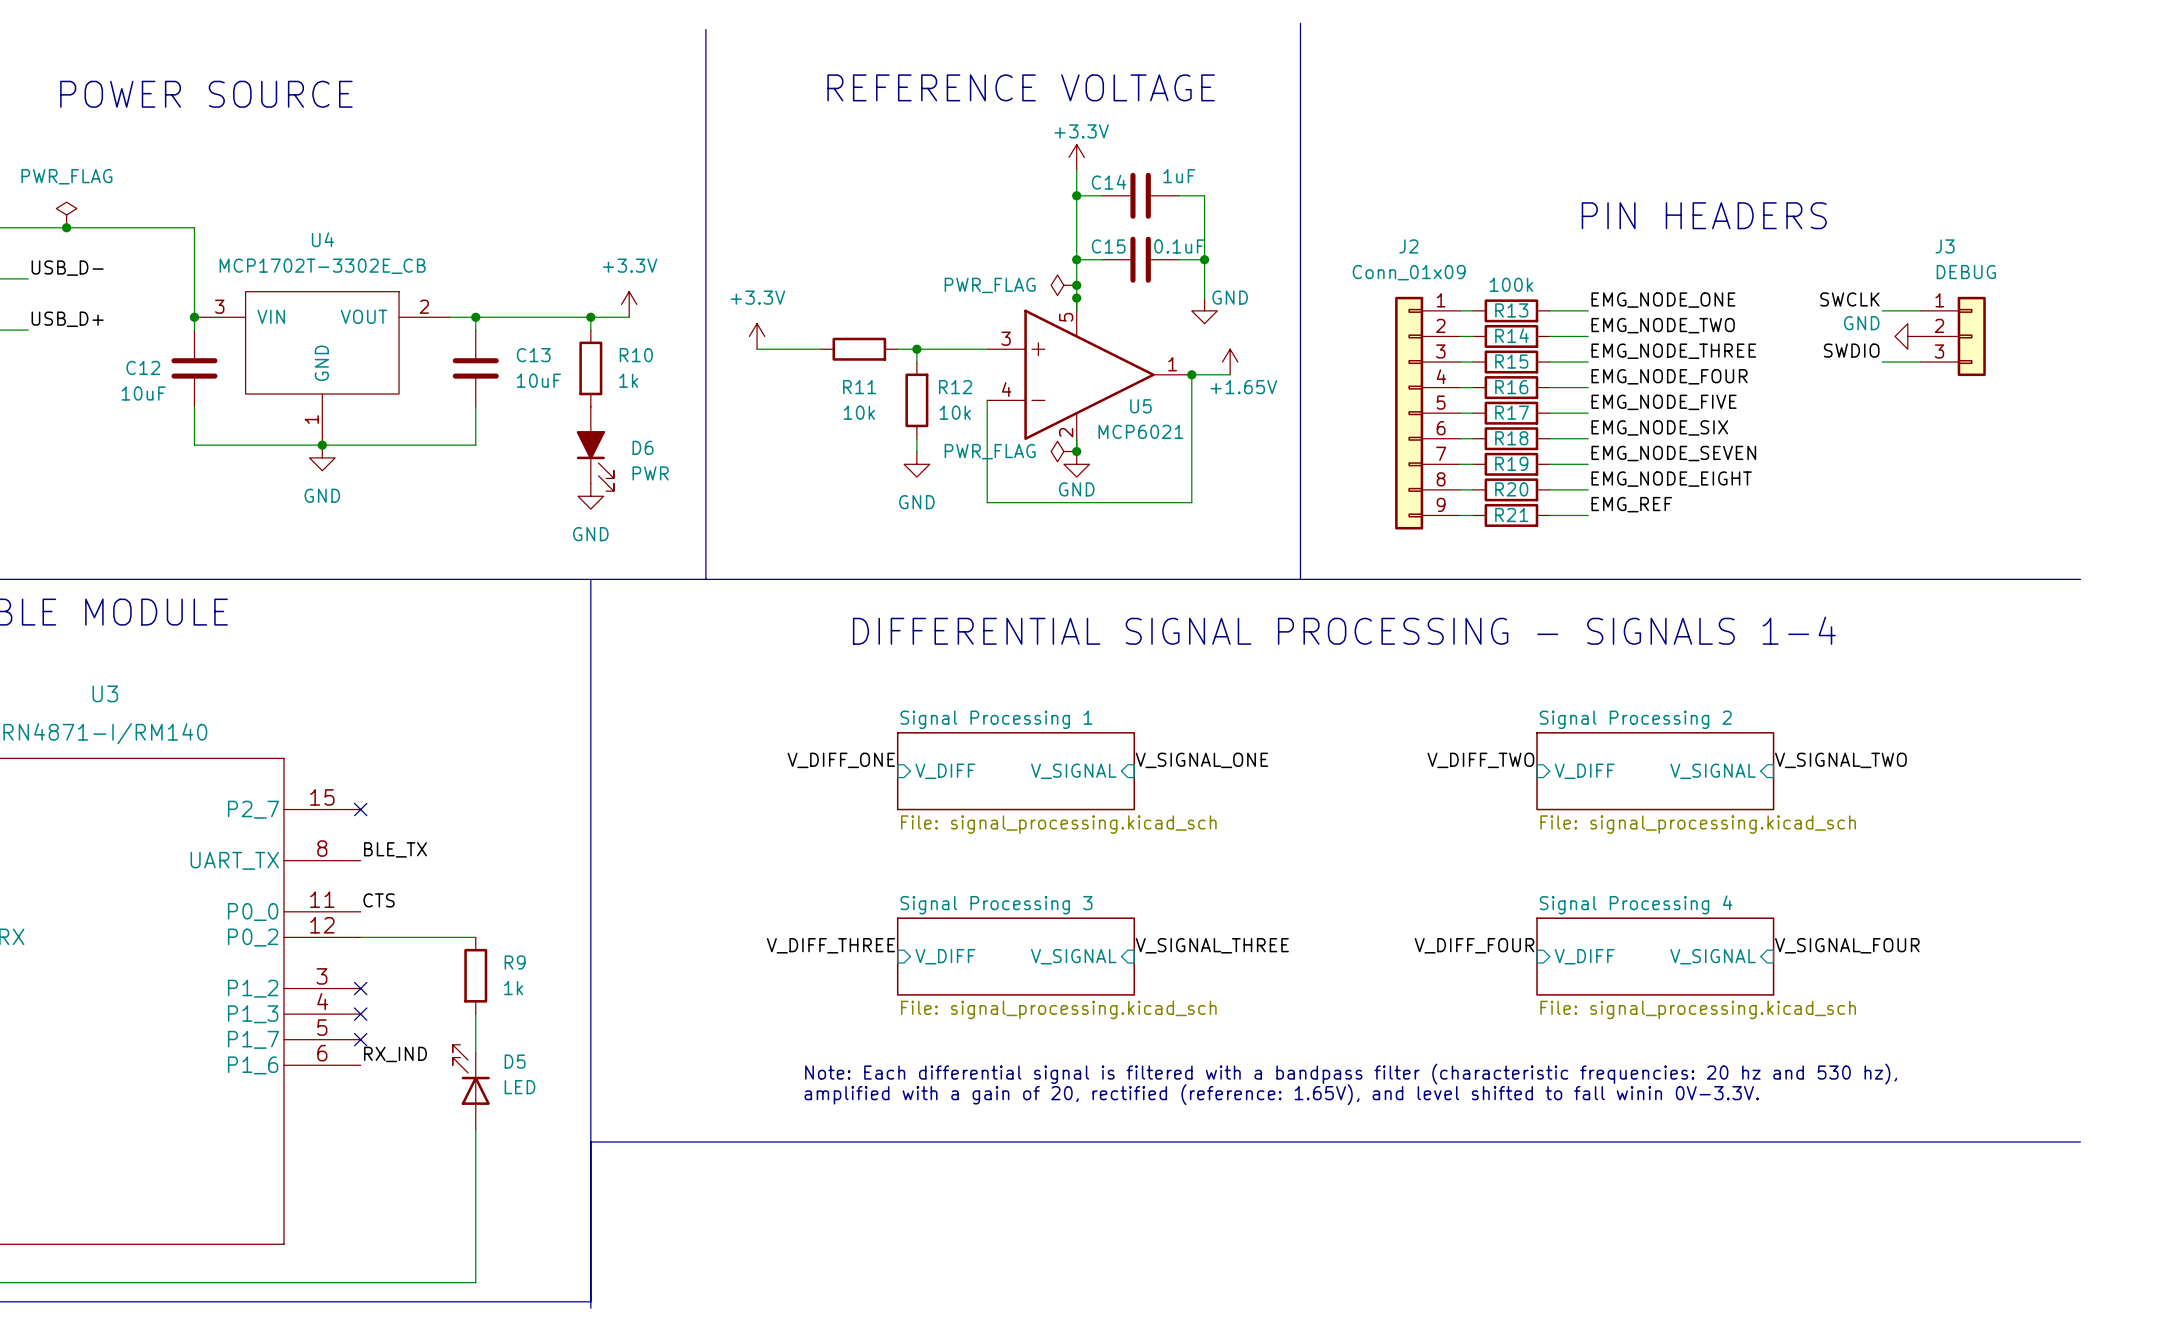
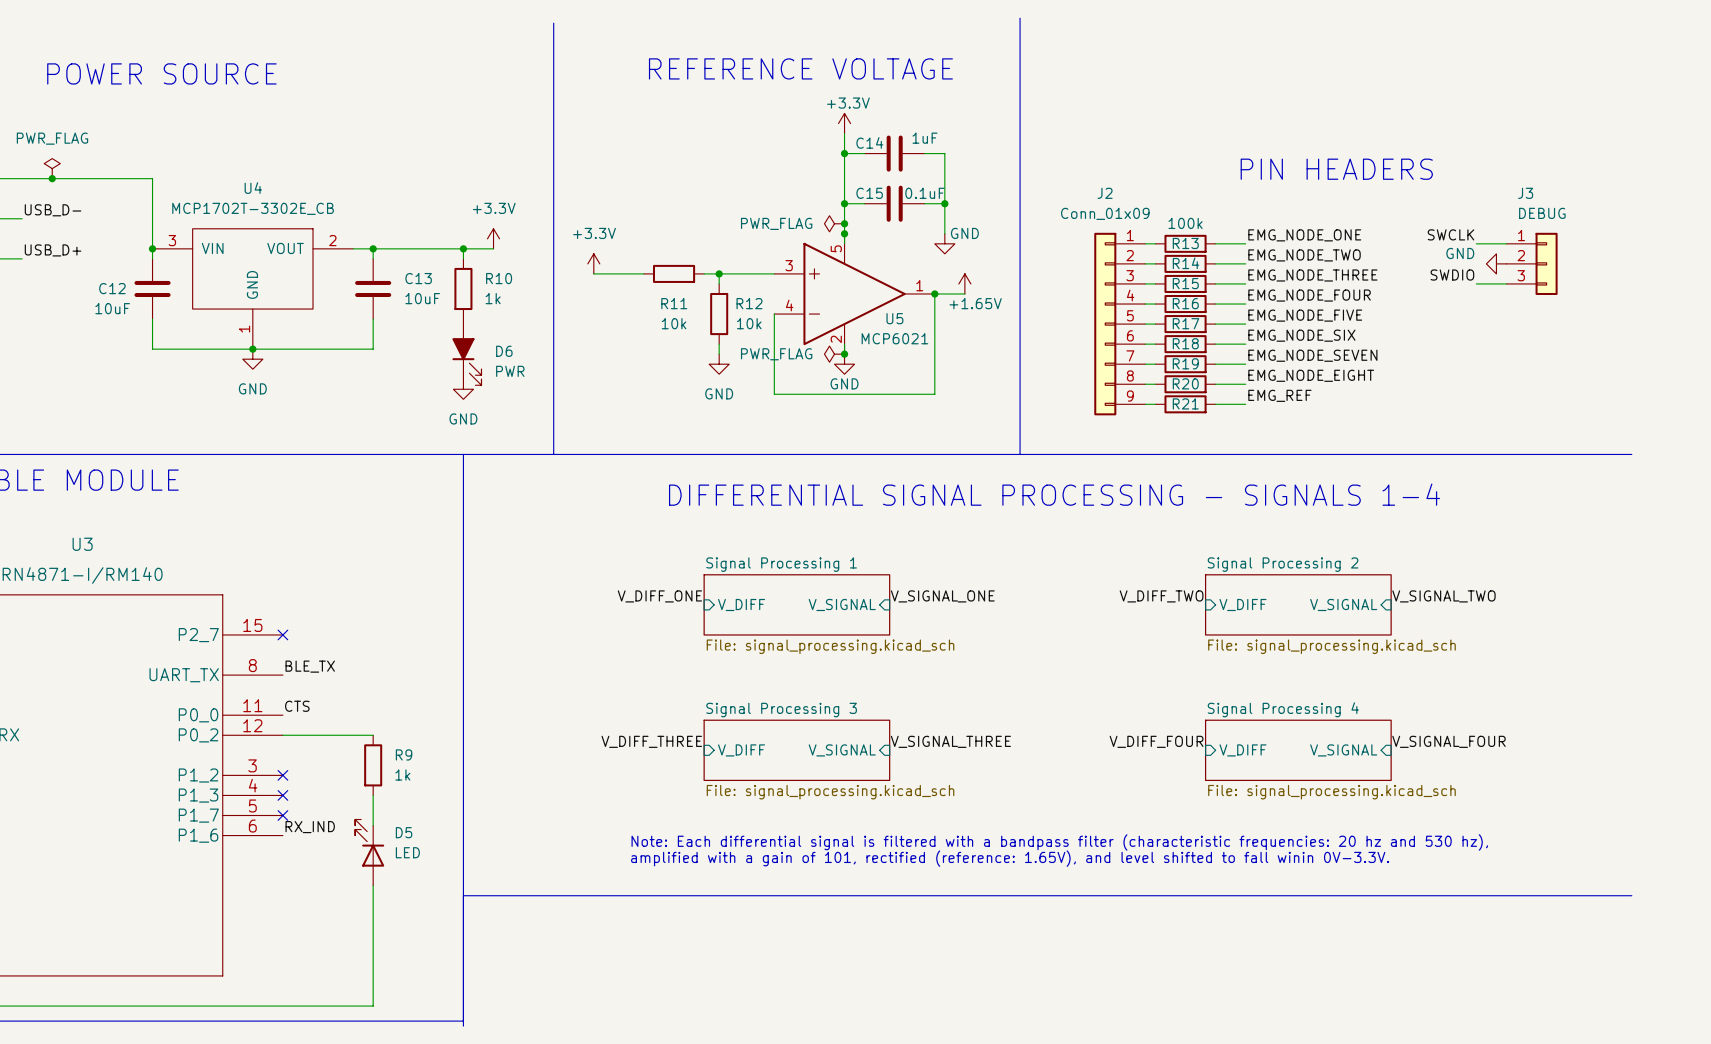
text: amplified with a gain of 20, rectified (reference: 1.65V), and level shifted to fall winin 0V-3.3V. (1281, 1094) -> amplified with a gain of 101, rectified (reference: 1.65V), and level shifted to fall winin 0V-3.3V. (1010, 858)

